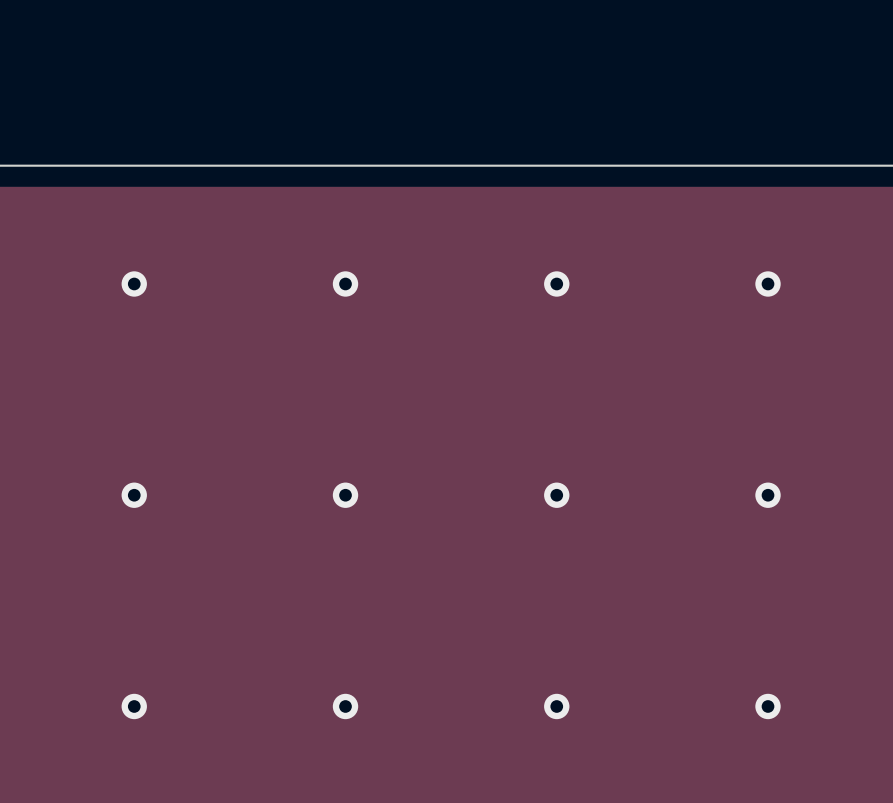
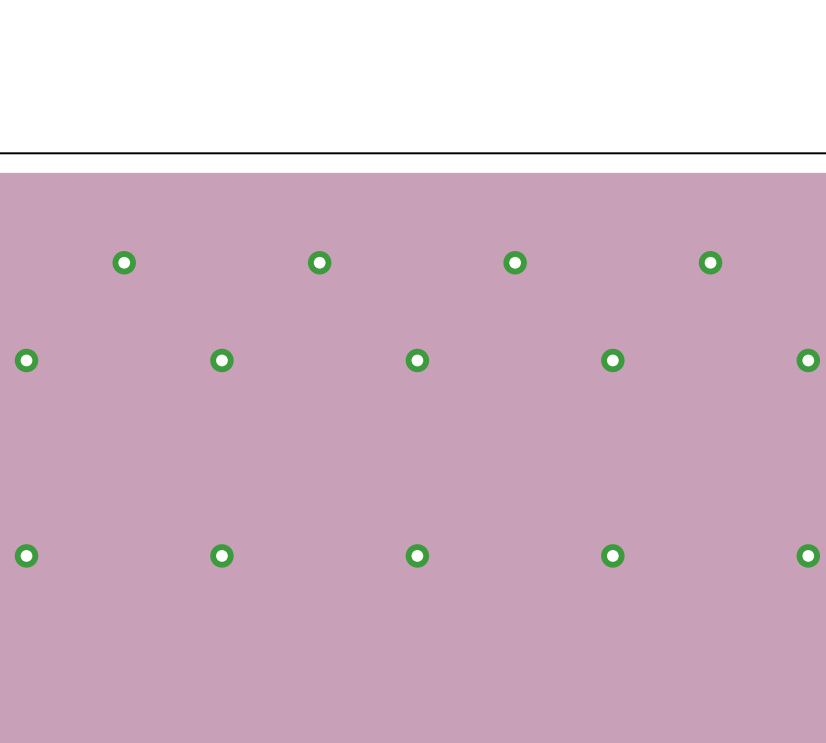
via: none -> (26, 360)
via: none -> (221, 360)
via: none -> (417, 360)
via: none -> (612, 360)
via: none -> (808, 360)
via: (134, 495) -> none
via: (345, 495) -> none
via: (556, 495) -> none
via: (768, 495) -> none
via: none -> (26, 555)
via: none -> (221, 555)
via: none -> (417, 555)
via: none -> (612, 555)
via: none -> (808, 555)
via: (134, 706) -> none
via: (345, 706) -> none
via: (556, 706) -> none
via: (768, 706) -> none

